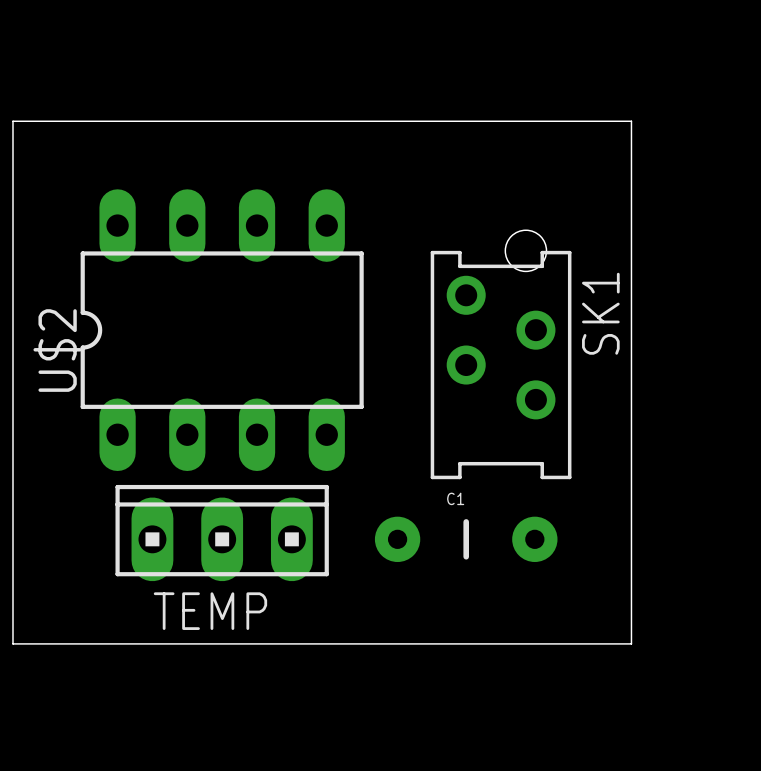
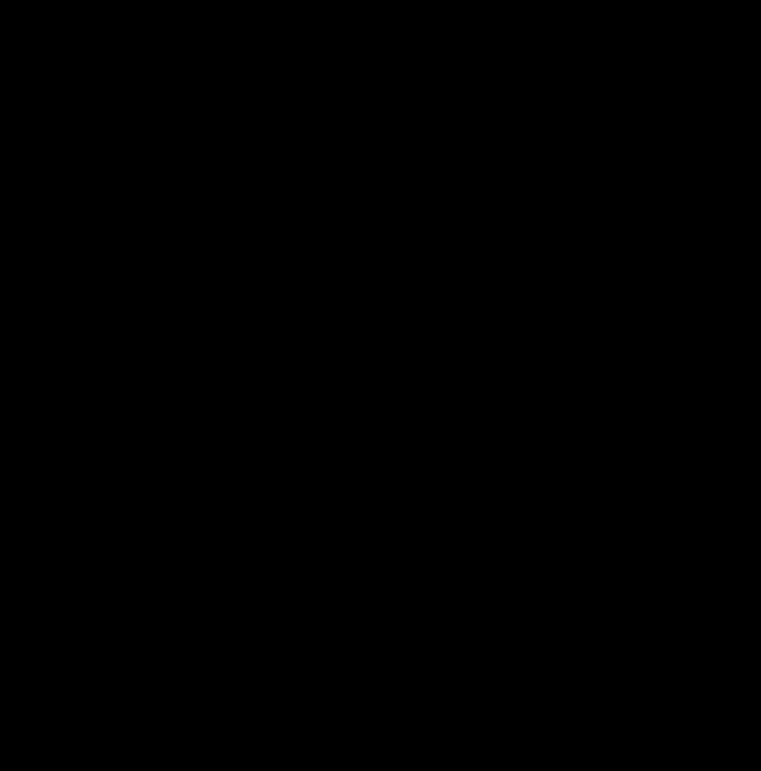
board edge: (12, 121) (631, 121) (631, 643) (12, 643) (12, 121) -> none
U$2: (222, 330) -> none
SK1: (501, 354) -> none
TEMP: (222, 533) -> none
C1: (466, 539) -> none

